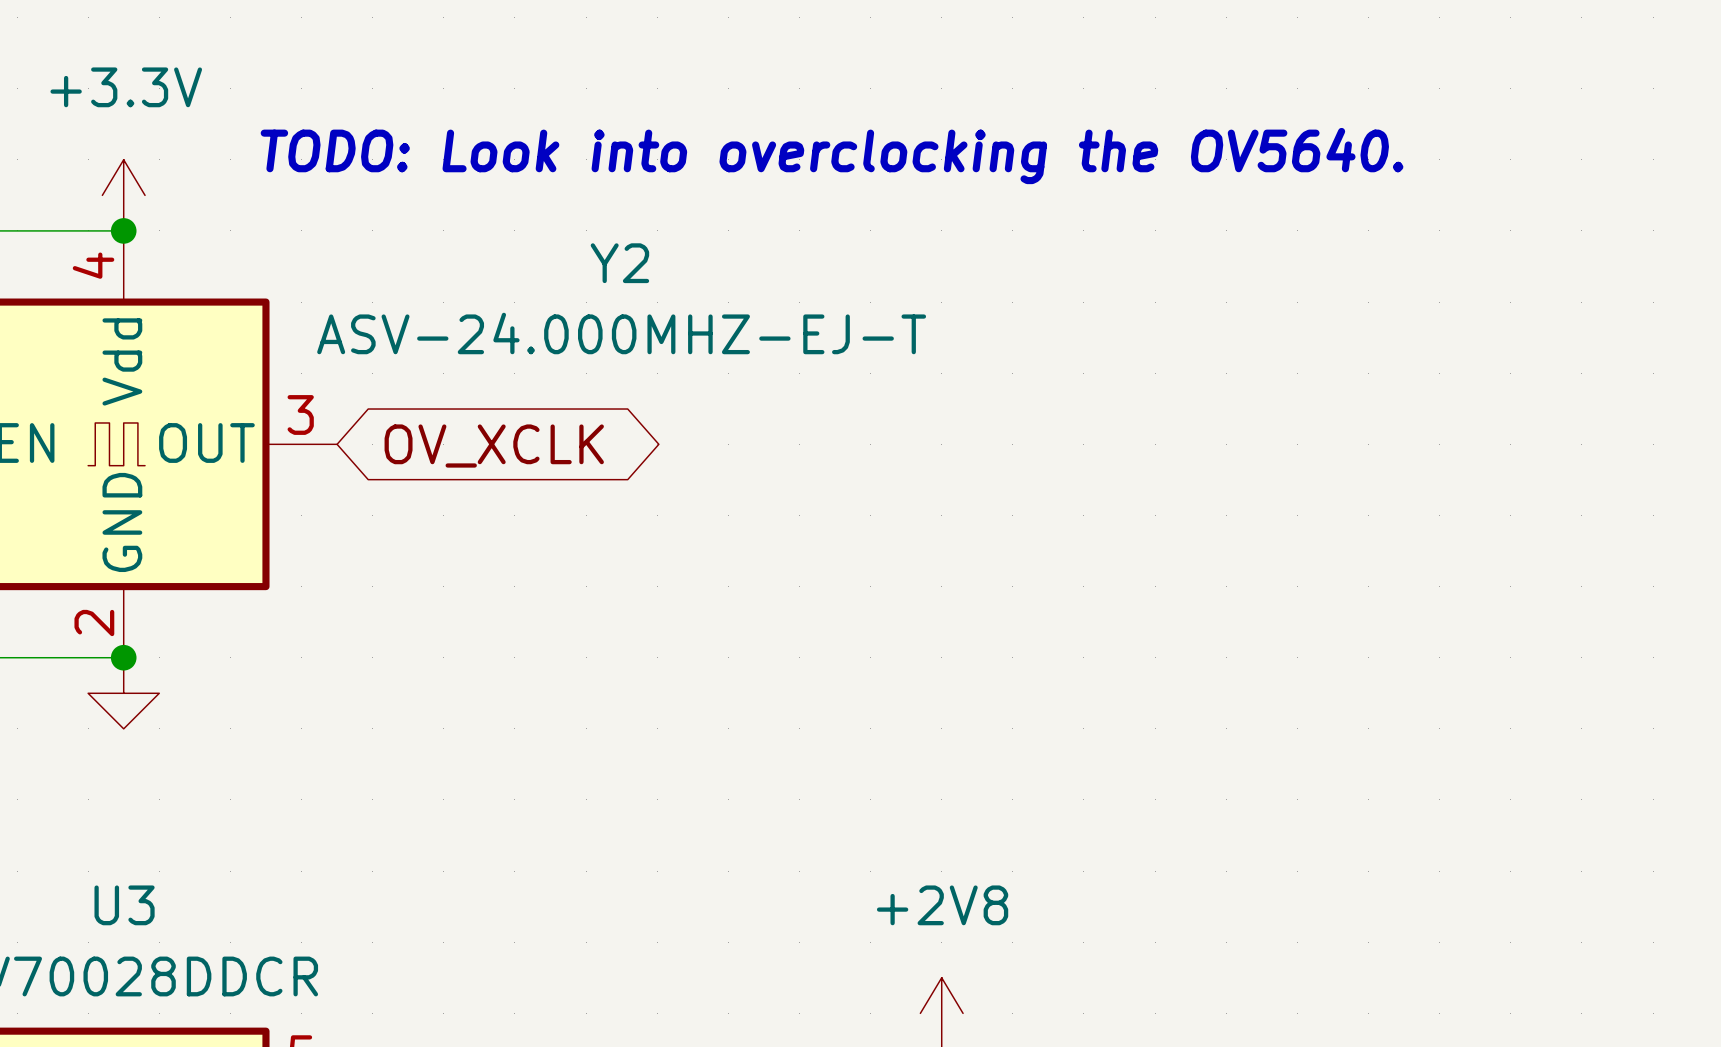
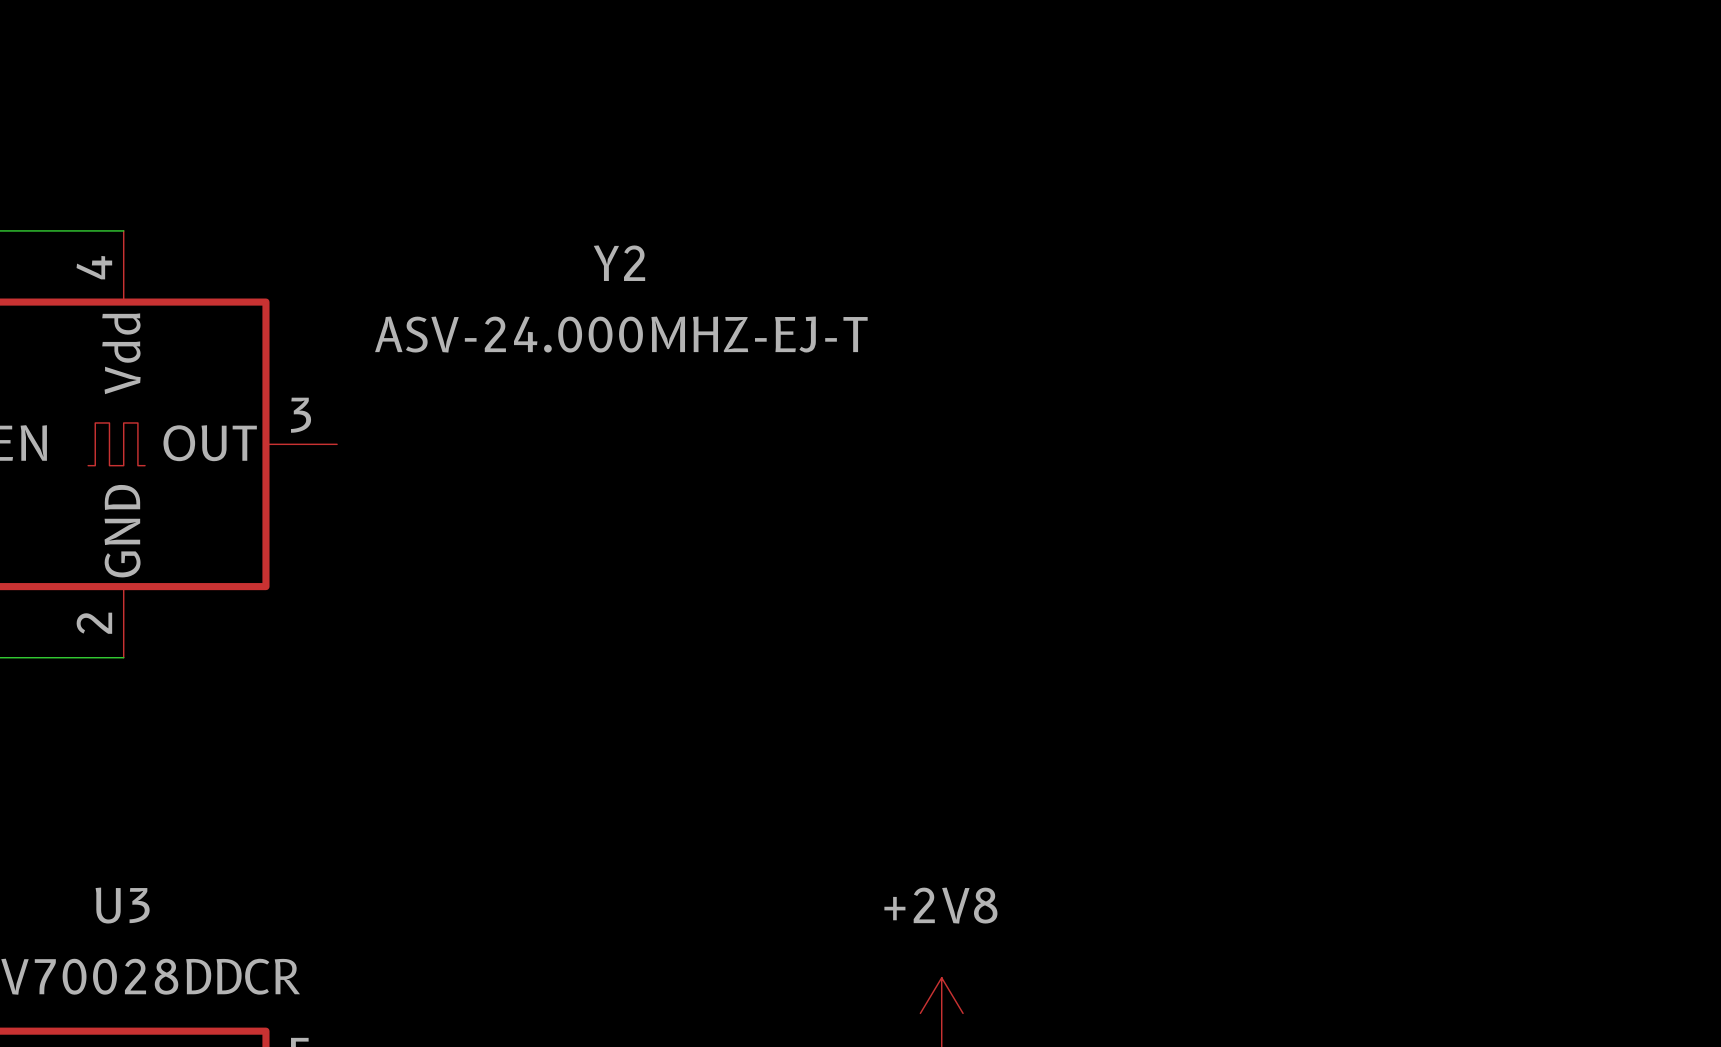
text: TODO: Look into overclocking the OV5640. (832, 156) -> none
power symbol: +3.3V (123, 195) -> none
junction: (123, 230) -> none
global label: OV_XCLK (494, 446) -> none
junction: (123, 657) -> none
power symbol: (123, 693) -> none

